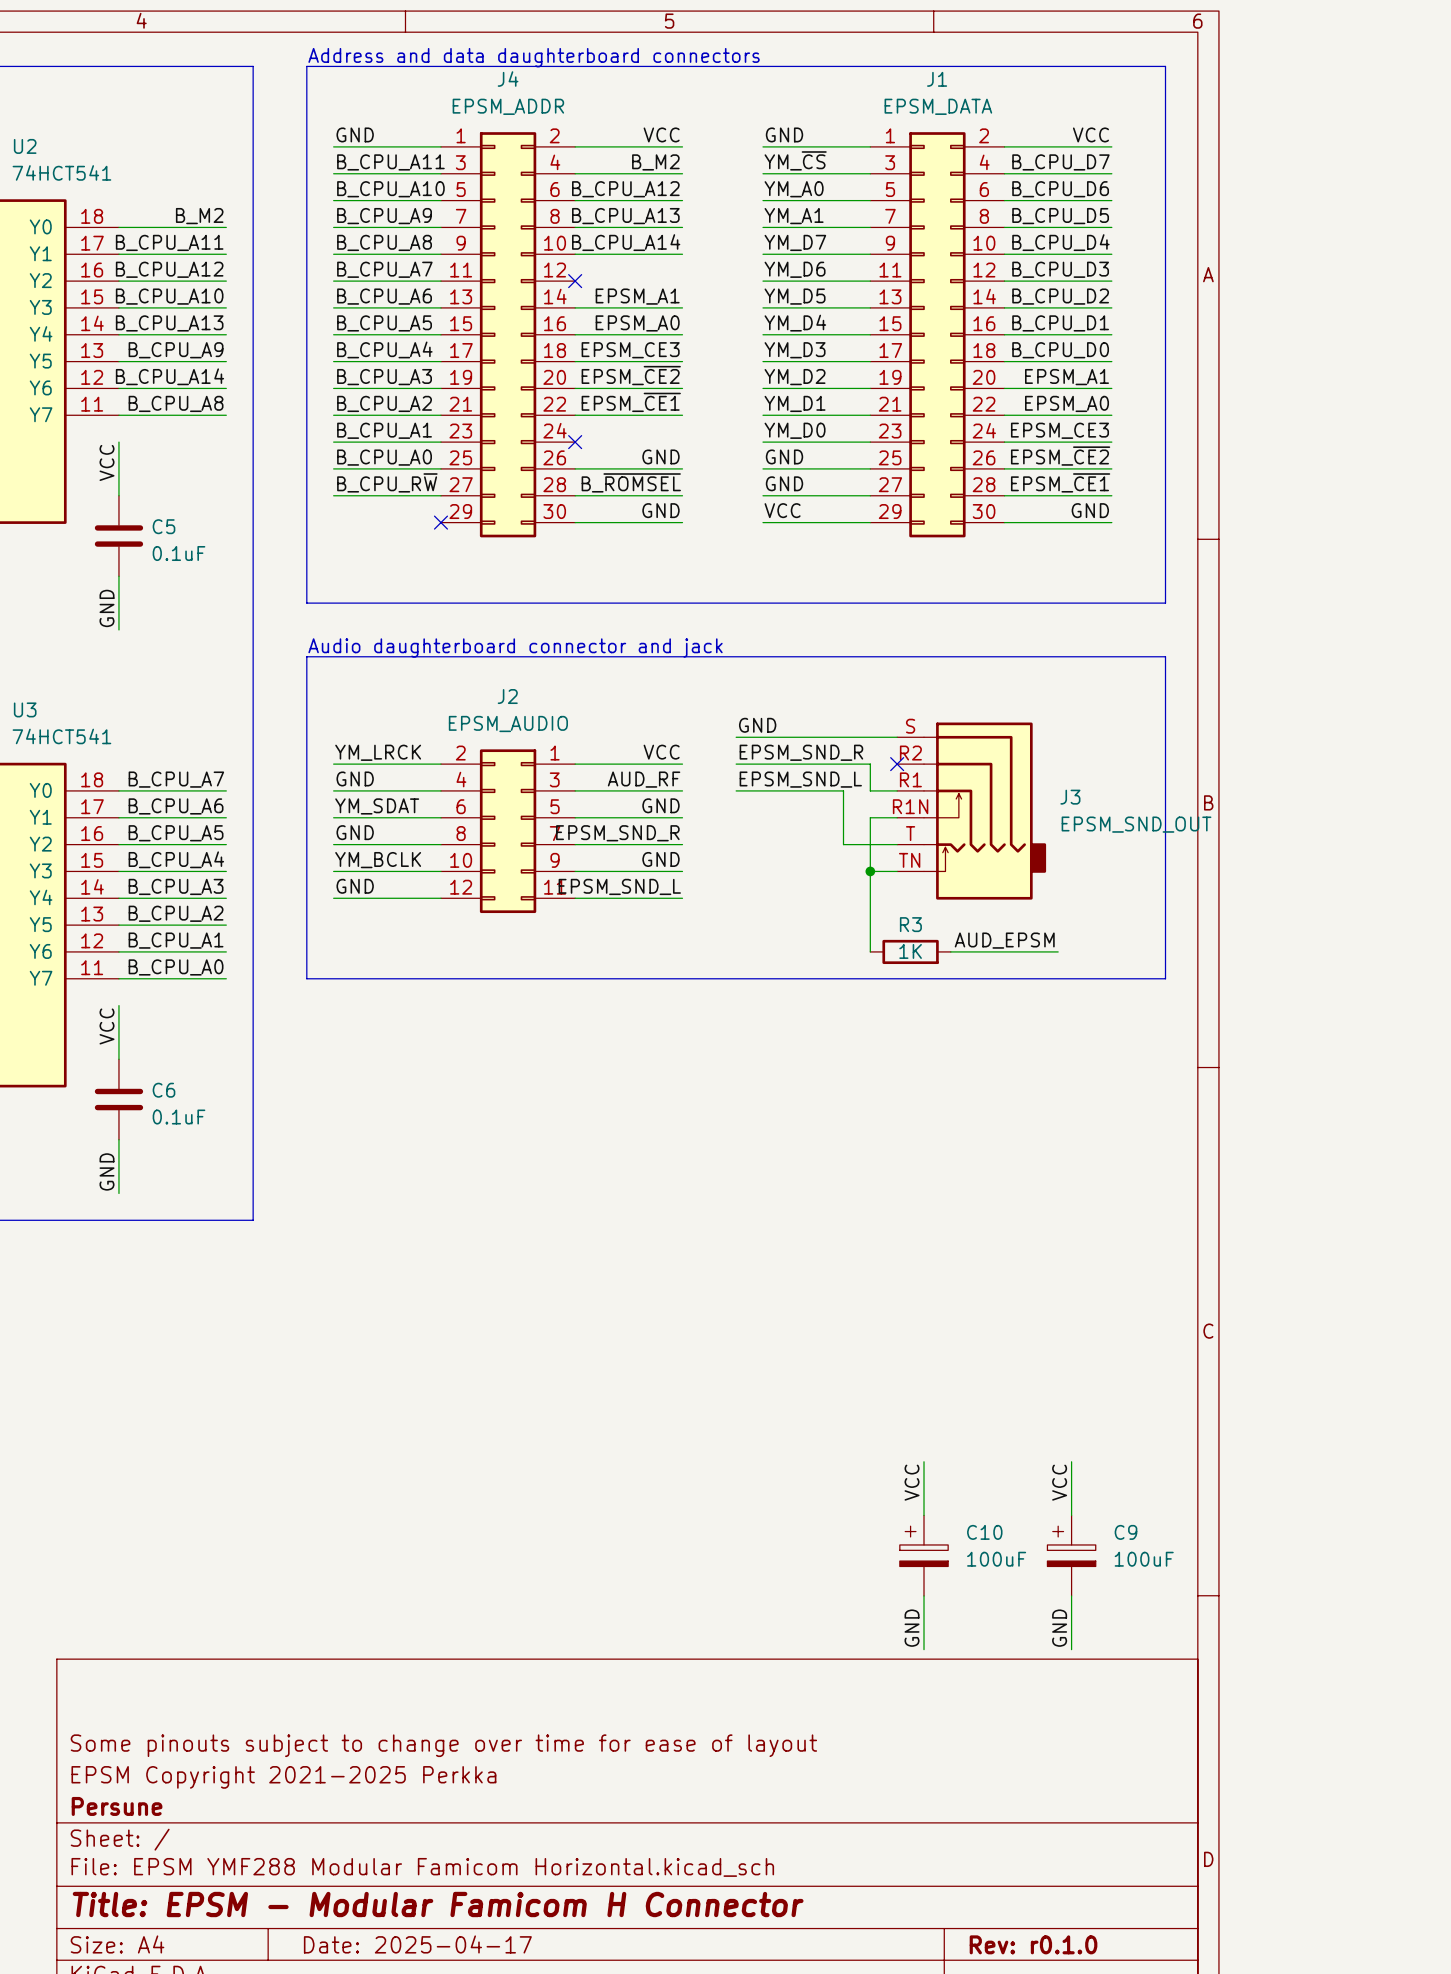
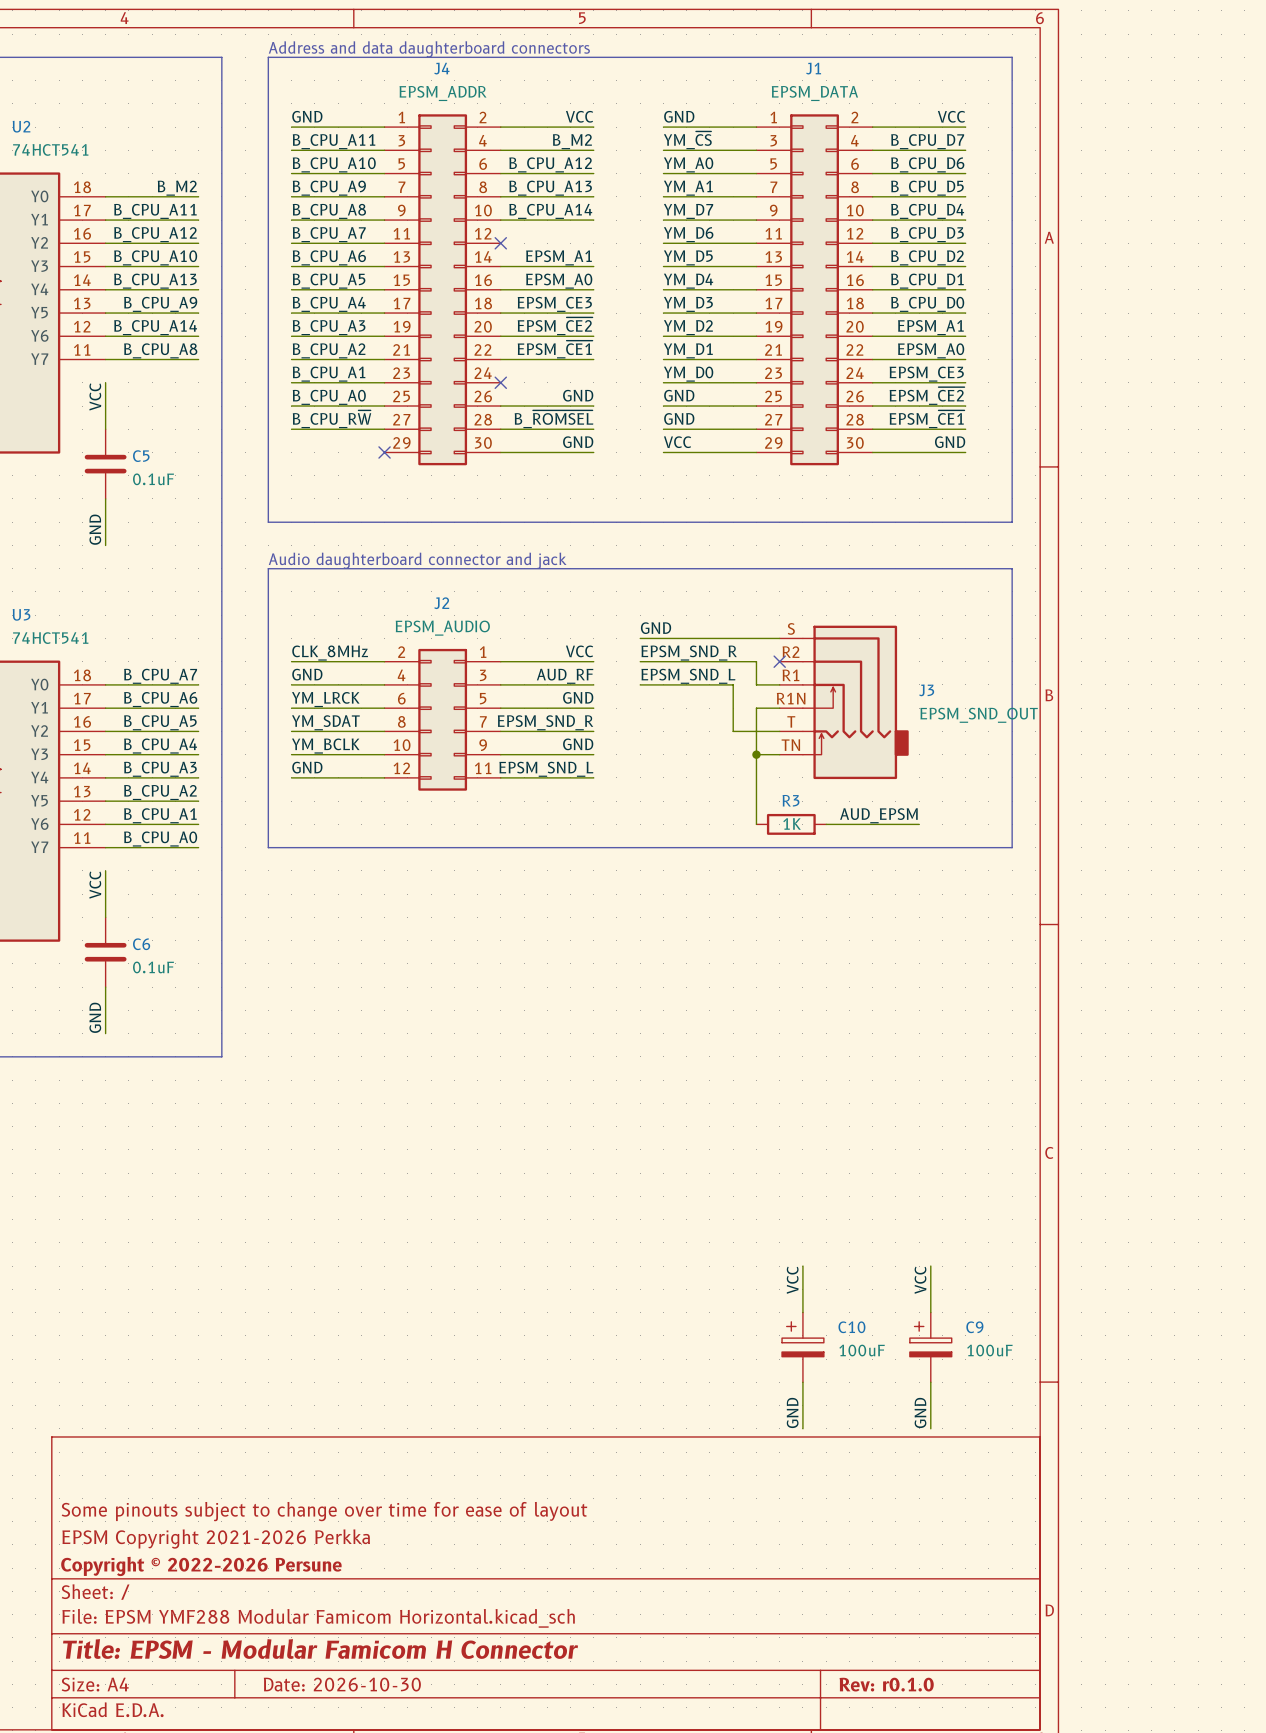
label: YM_LRCK (378, 752) -> CLK_8MHz (330, 653)
label: YM_SDAT (377, 806) -> YM_LRCK (325, 699)
label: GND (355, 832) -> YM_SDAT (325, 722)
title block: EPSM Copyright 2021-2025 Perkka (283, 1777) -> EPSM Copyright 2021-2026 Perkka (216, 1539)
title block: Persune (117, 1806) -> Copyright © 2022-2026 Persune (201, 1566)
title block: Date: 2025-04-17 (417, 1944) -> Date: 2026-10-30 (342, 1684)

